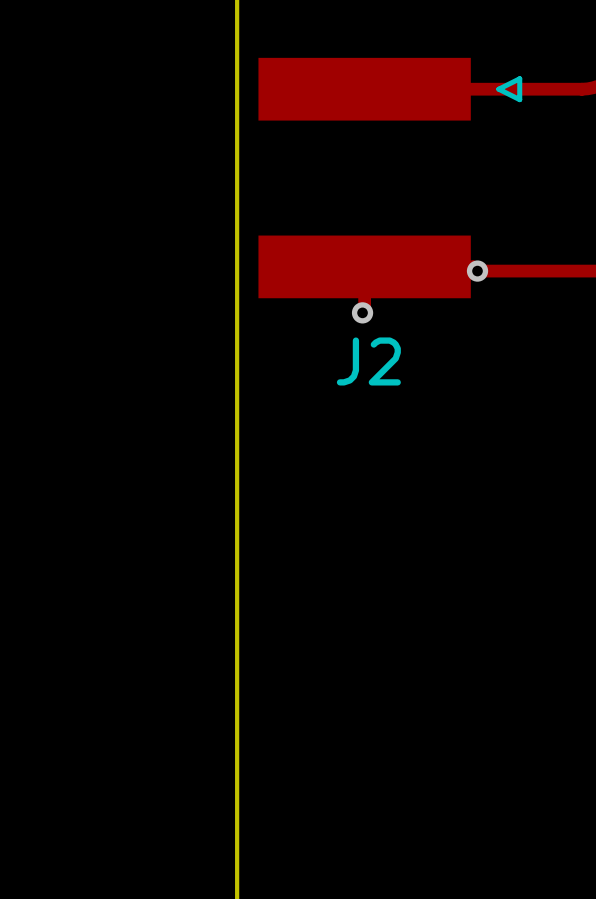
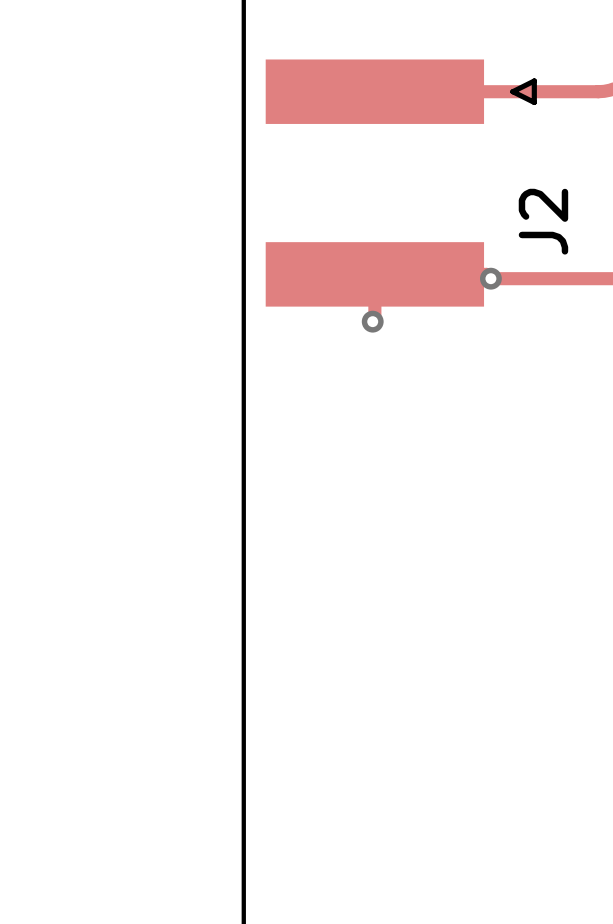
J2 name rotation: 0° (368, 361) -> 90° counterclockwise (543, 221)
J2 name position: J2 (368, 361) -> J2 (543, 221)

